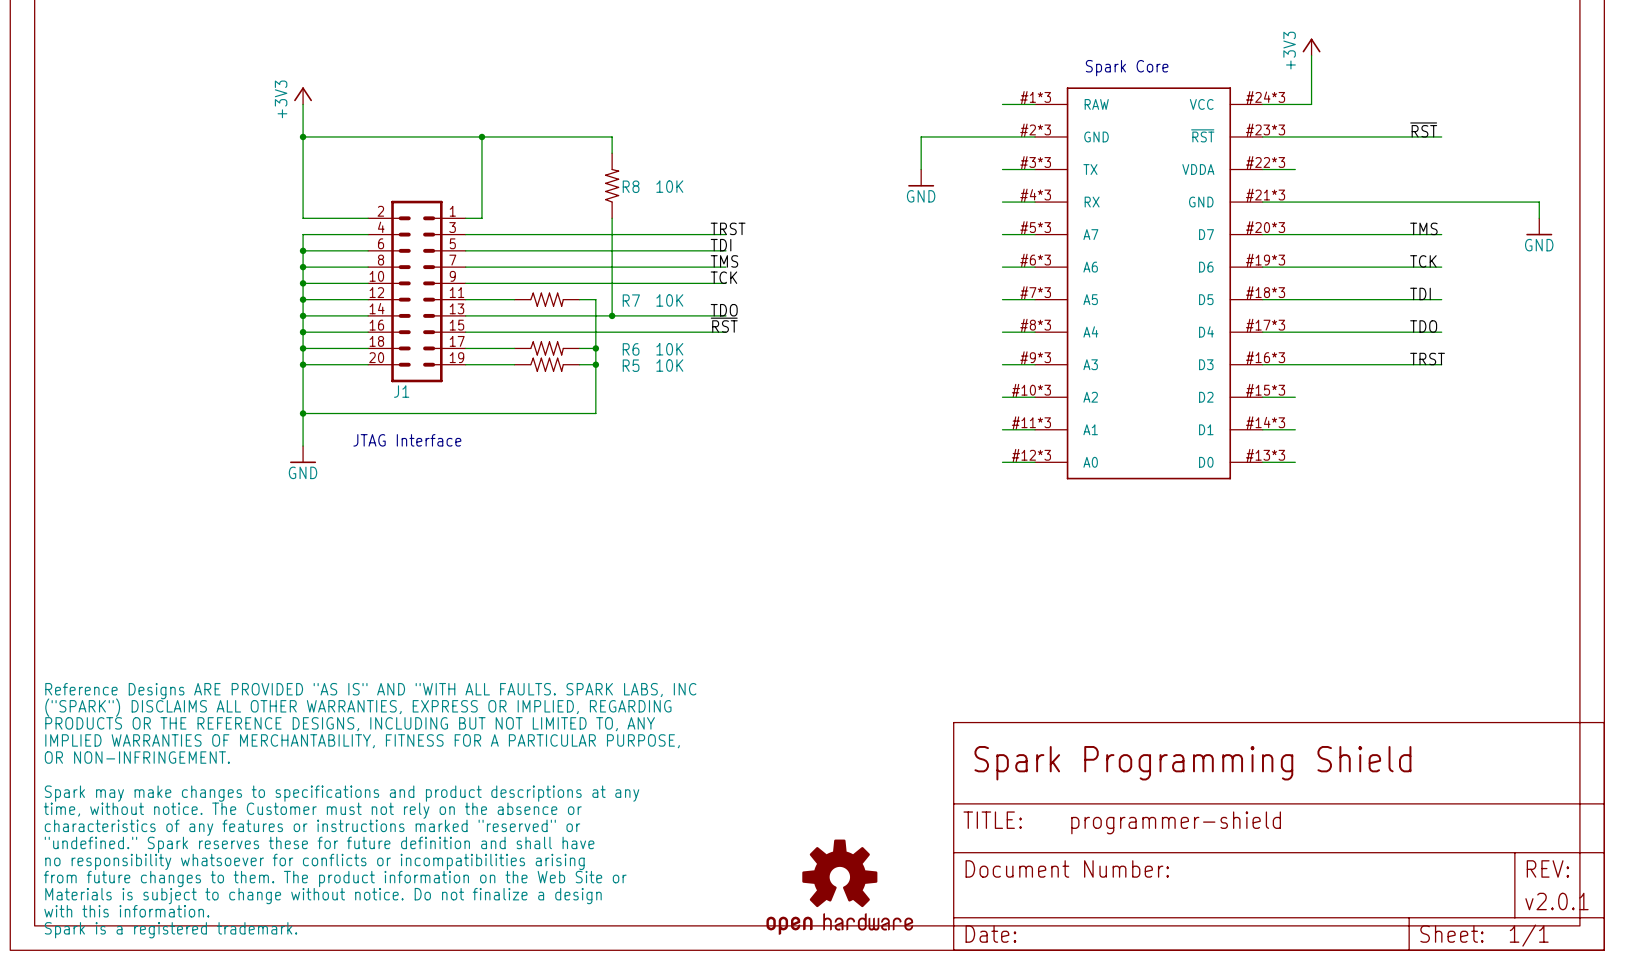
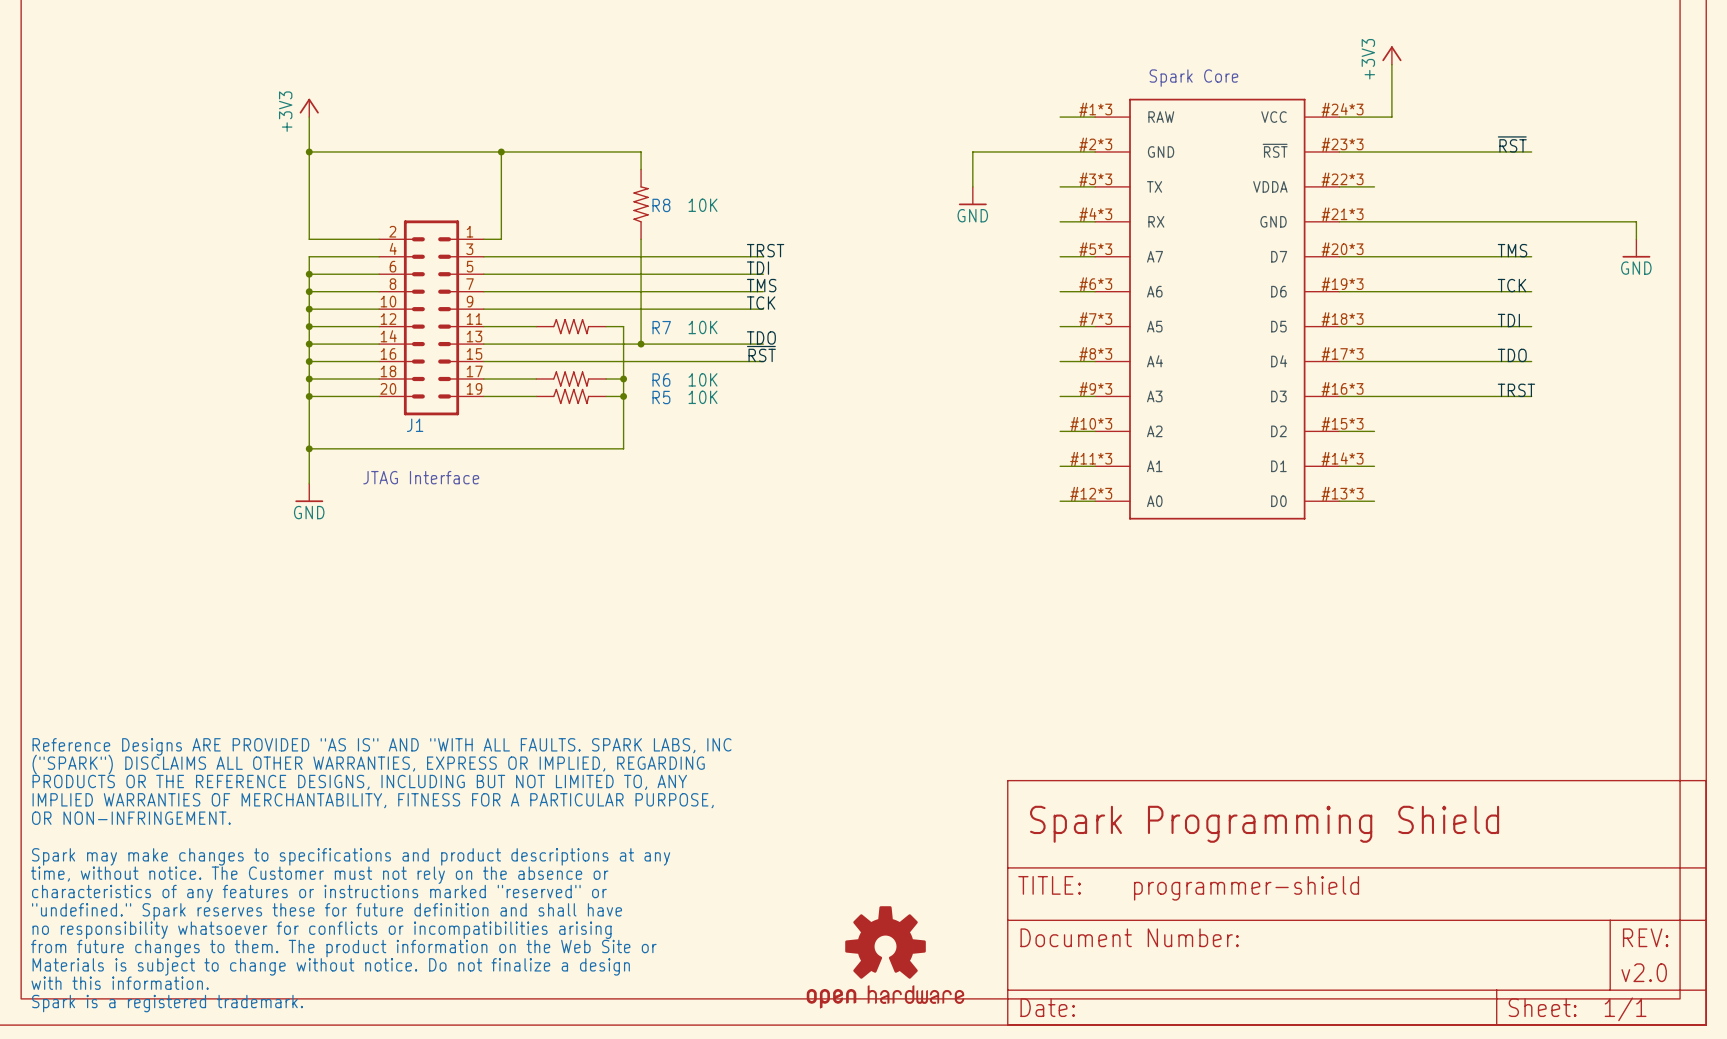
text: v2.0.1 (1556, 901) -> v2.0 (1644, 972)

